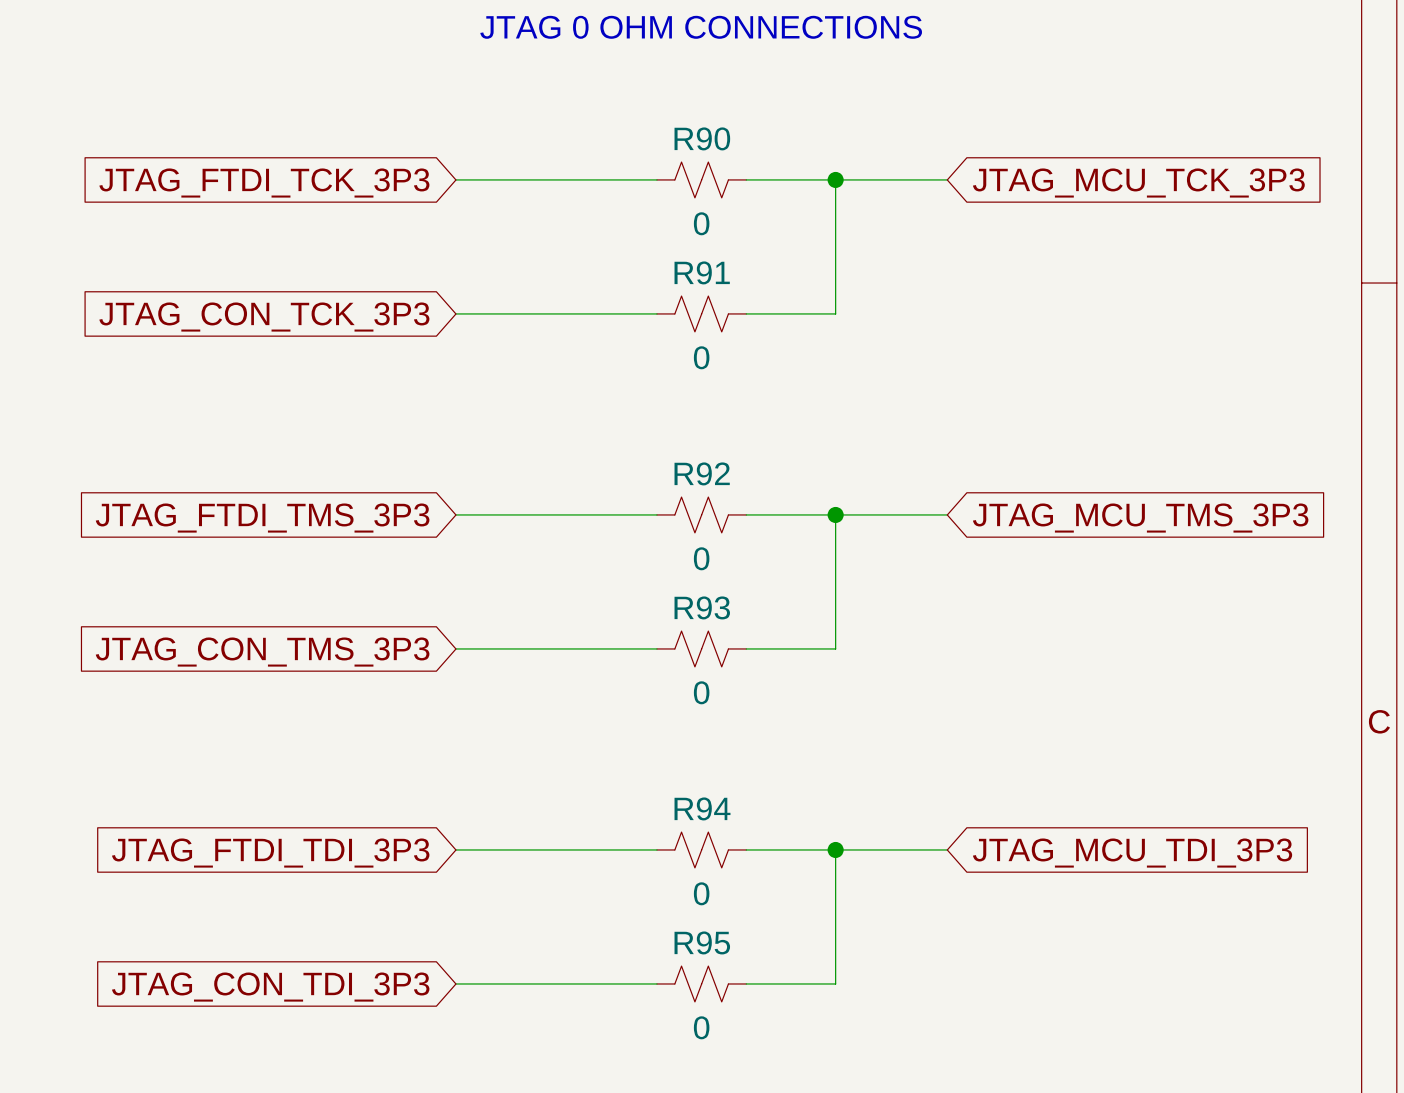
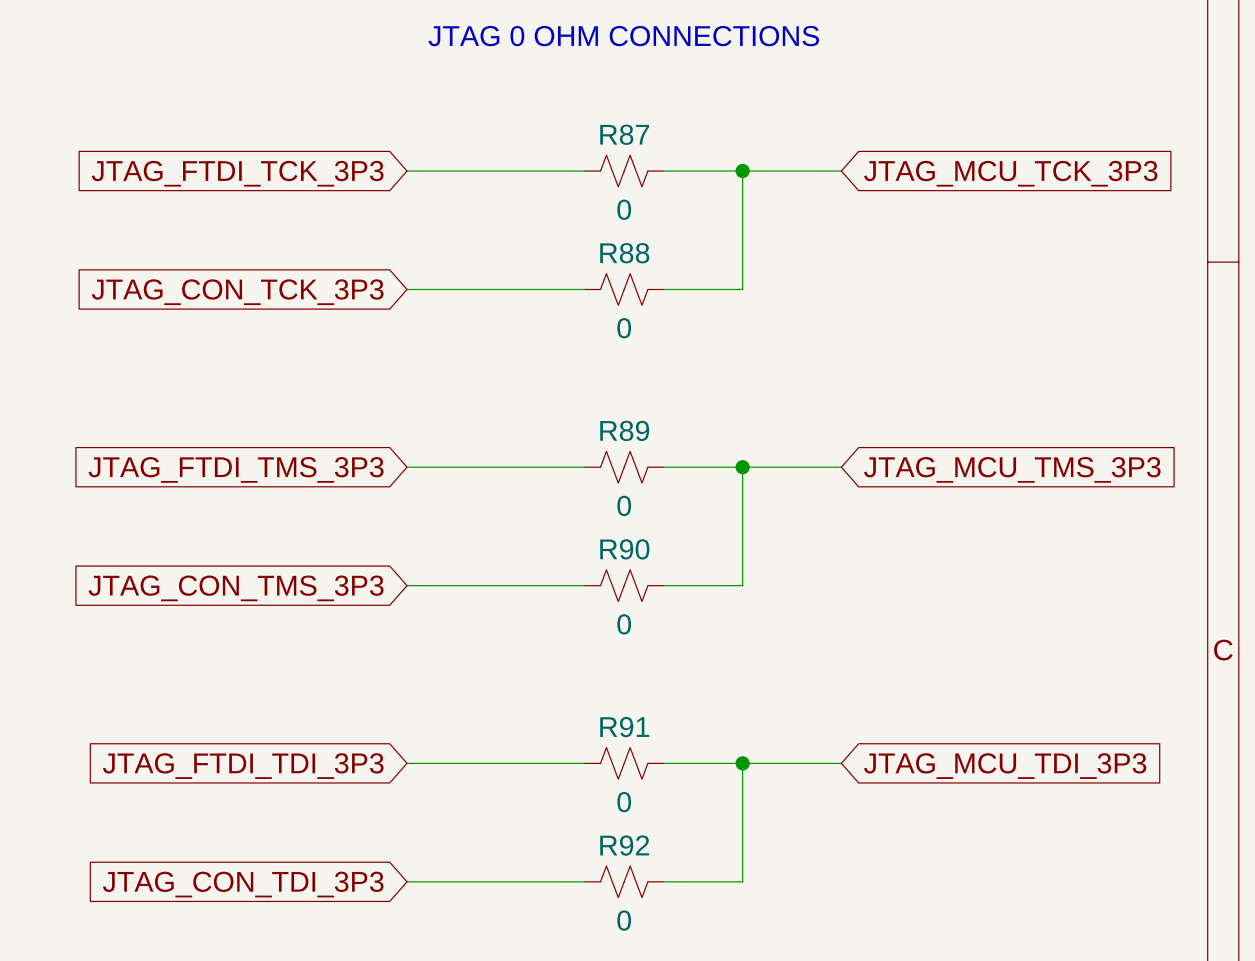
R90 name: R90 (702, 138) -> R87 (624, 134)
R91 name: R91 (702, 272) -> R88 (624, 253)
R92 name: R92 (702, 473) -> R89 (624, 430)
R93 name: R93 (702, 607) -> R90 (624, 549)
R94 name: R94 (702, 808) -> R91 (624, 727)
R95 name: R95 (702, 942) -> R92 (624, 845)

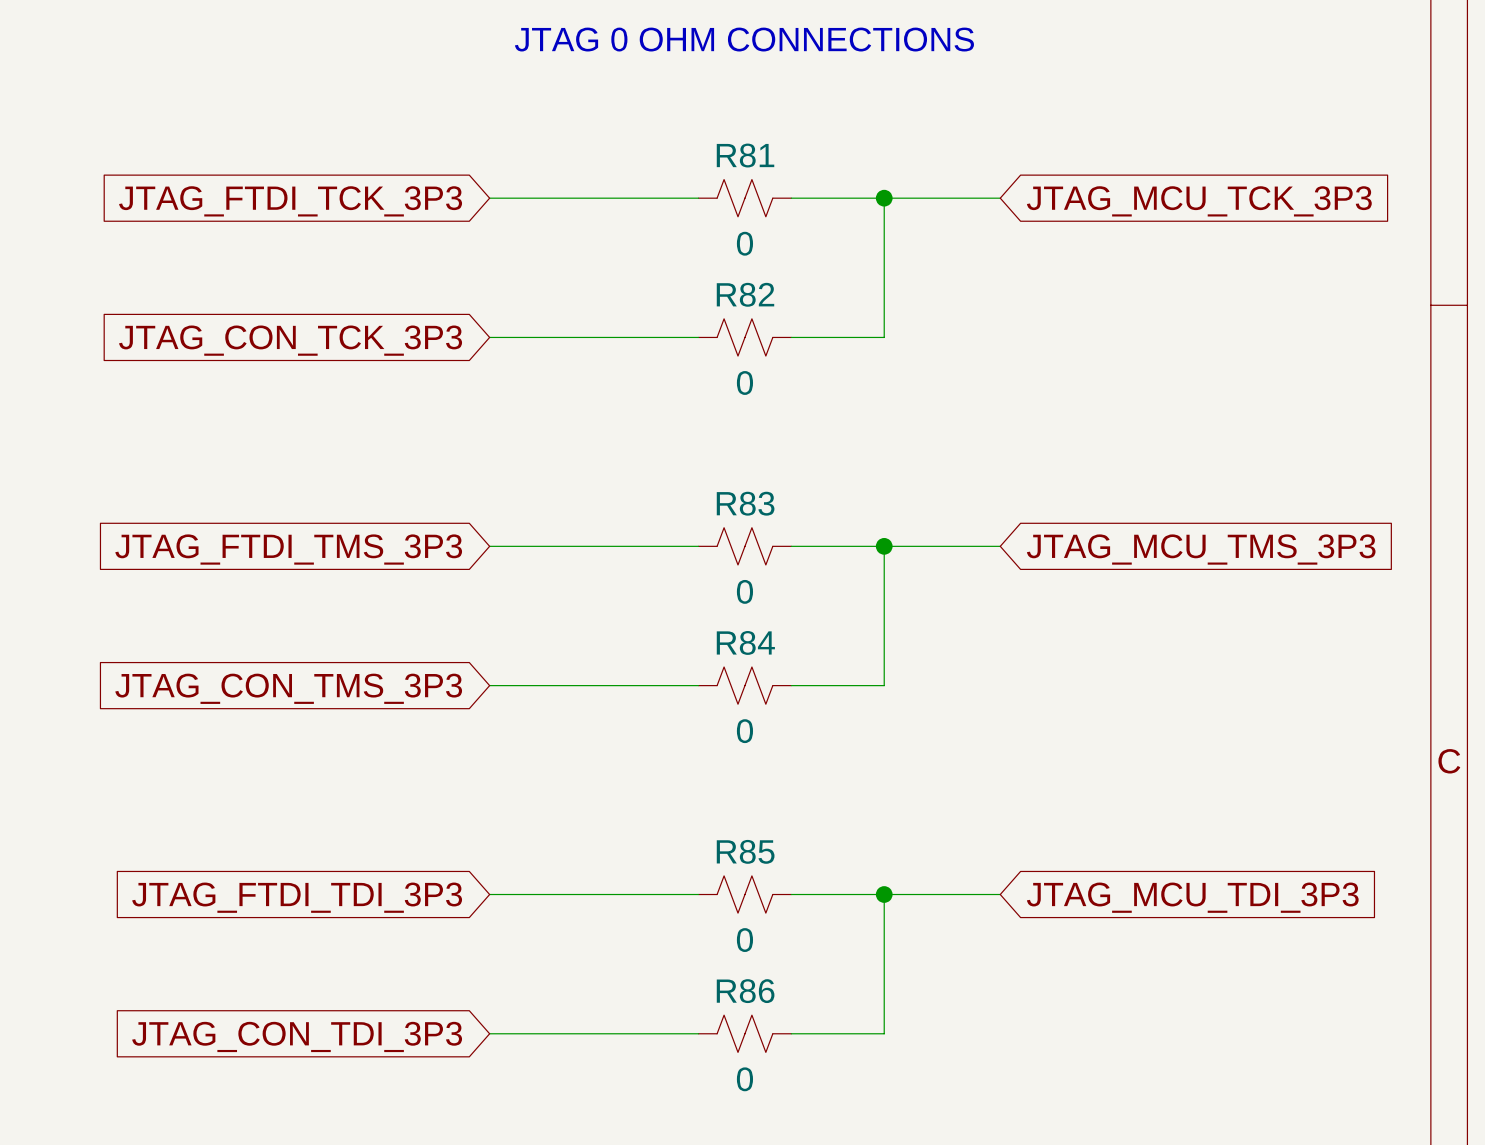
R87 name: R87 (624, 134) -> R81 (745, 155)
R88 name: R88 (624, 253) -> R82 (745, 294)
R89 name: R89 (624, 430) -> R83 (745, 503)
R90 name: R90 (624, 549) -> R84 (745, 642)
R91 name: R91 (624, 727) -> R85 (745, 851)
R92 name: R92 (624, 845) -> R86 (745, 991)

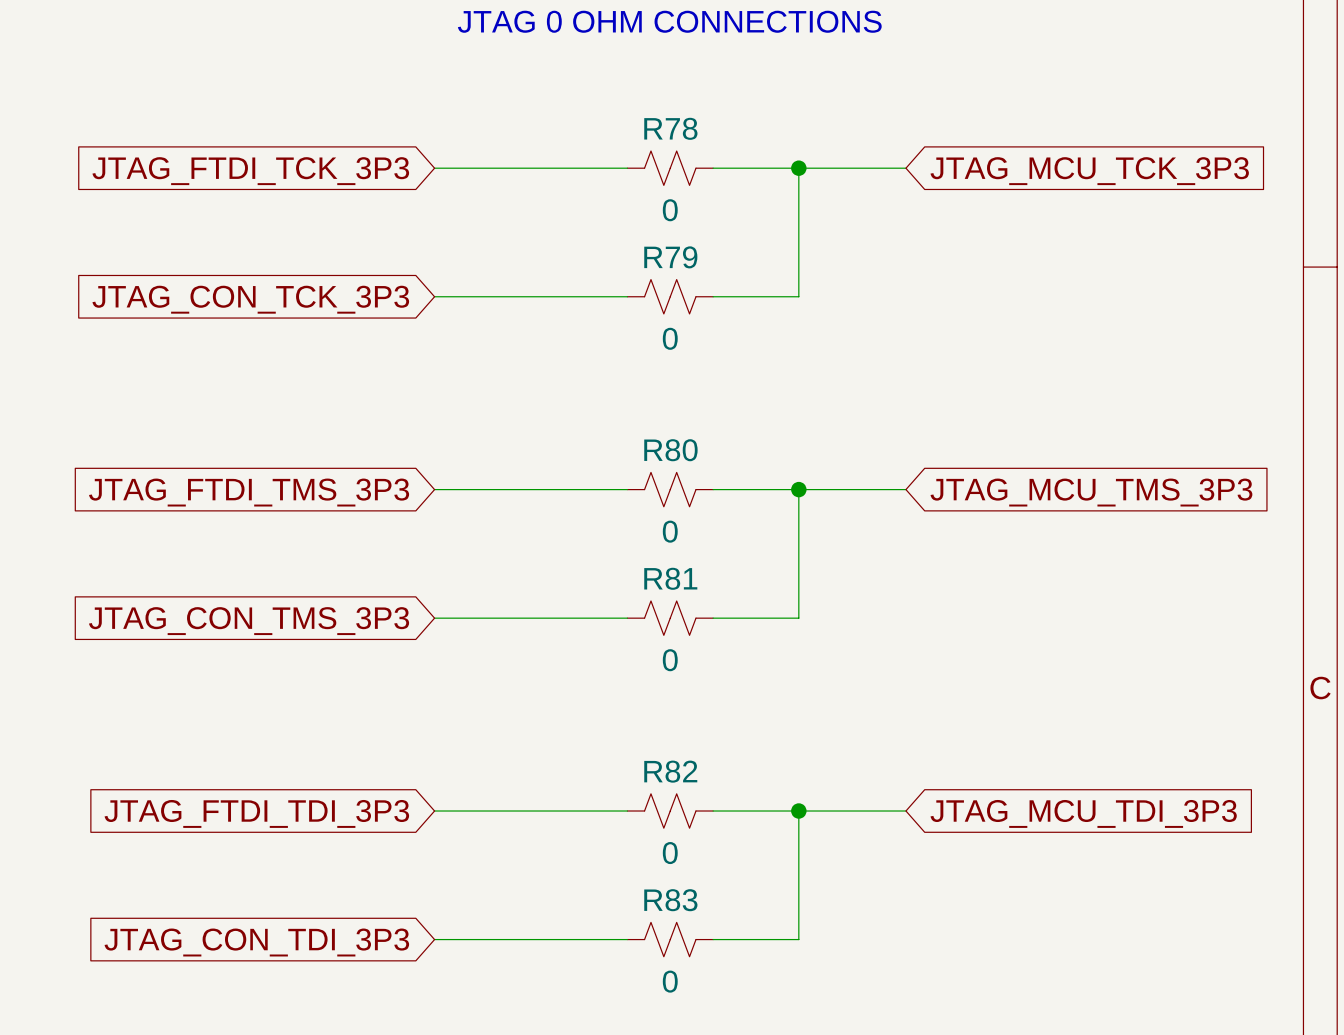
R81 name: R81 (745, 155) -> R78 (670, 128)
R82 name: R82 (745, 294) -> R79 (670, 257)
R83 name: R83 (745, 503) -> R80 (670, 450)
R84 name: R84 (745, 642) -> R81 (670, 578)
R85 name: R85 (745, 851) -> R82 (670, 771)
R86 name: R86 (745, 991) -> R83 (670, 900)

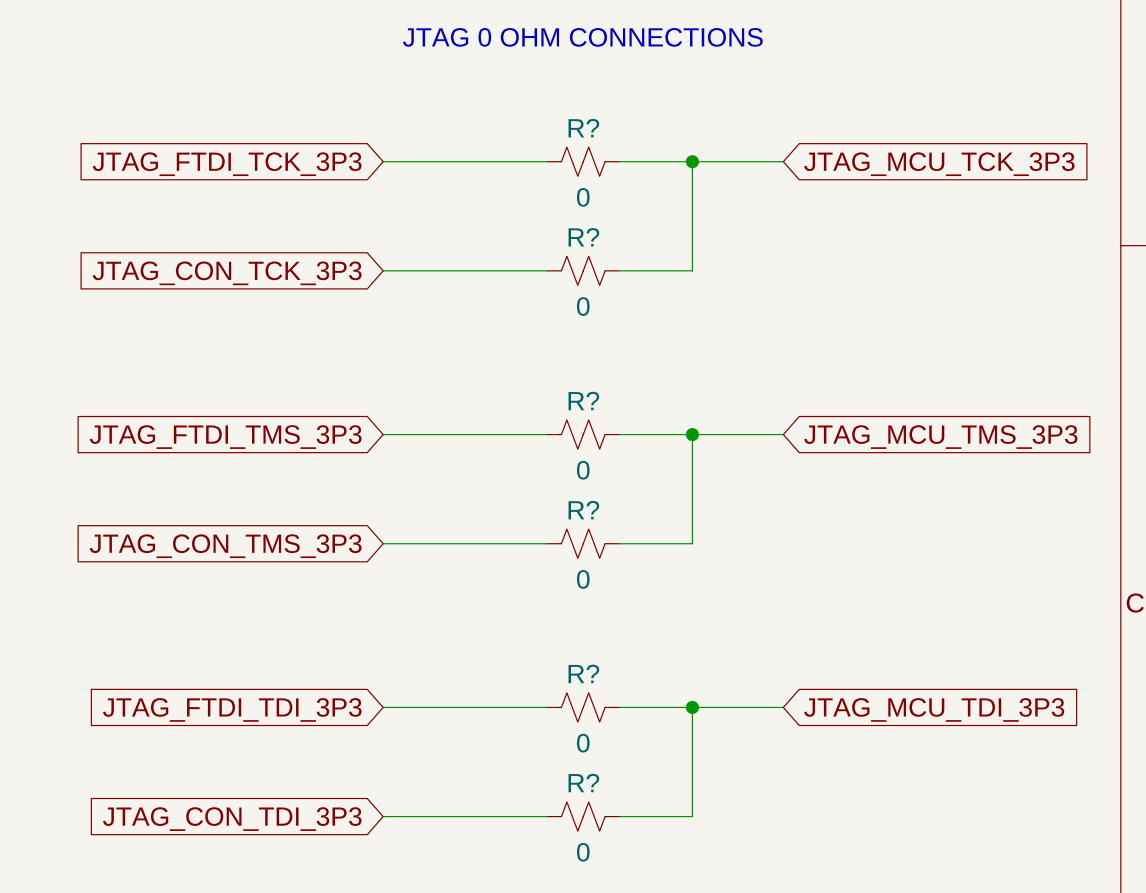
R78 name: R78 (670, 128) -> R? (583, 128)
R79 name: R79 (670, 257) -> R? (583, 237)
R80 name: R80 (670, 450) -> R? (583, 401)
R81 name: R81 (670, 578) -> R? (583, 510)
R82 name: R82 (670, 771) -> R? (583, 673)
R83 name: R83 (670, 900) -> R? (583, 783)

